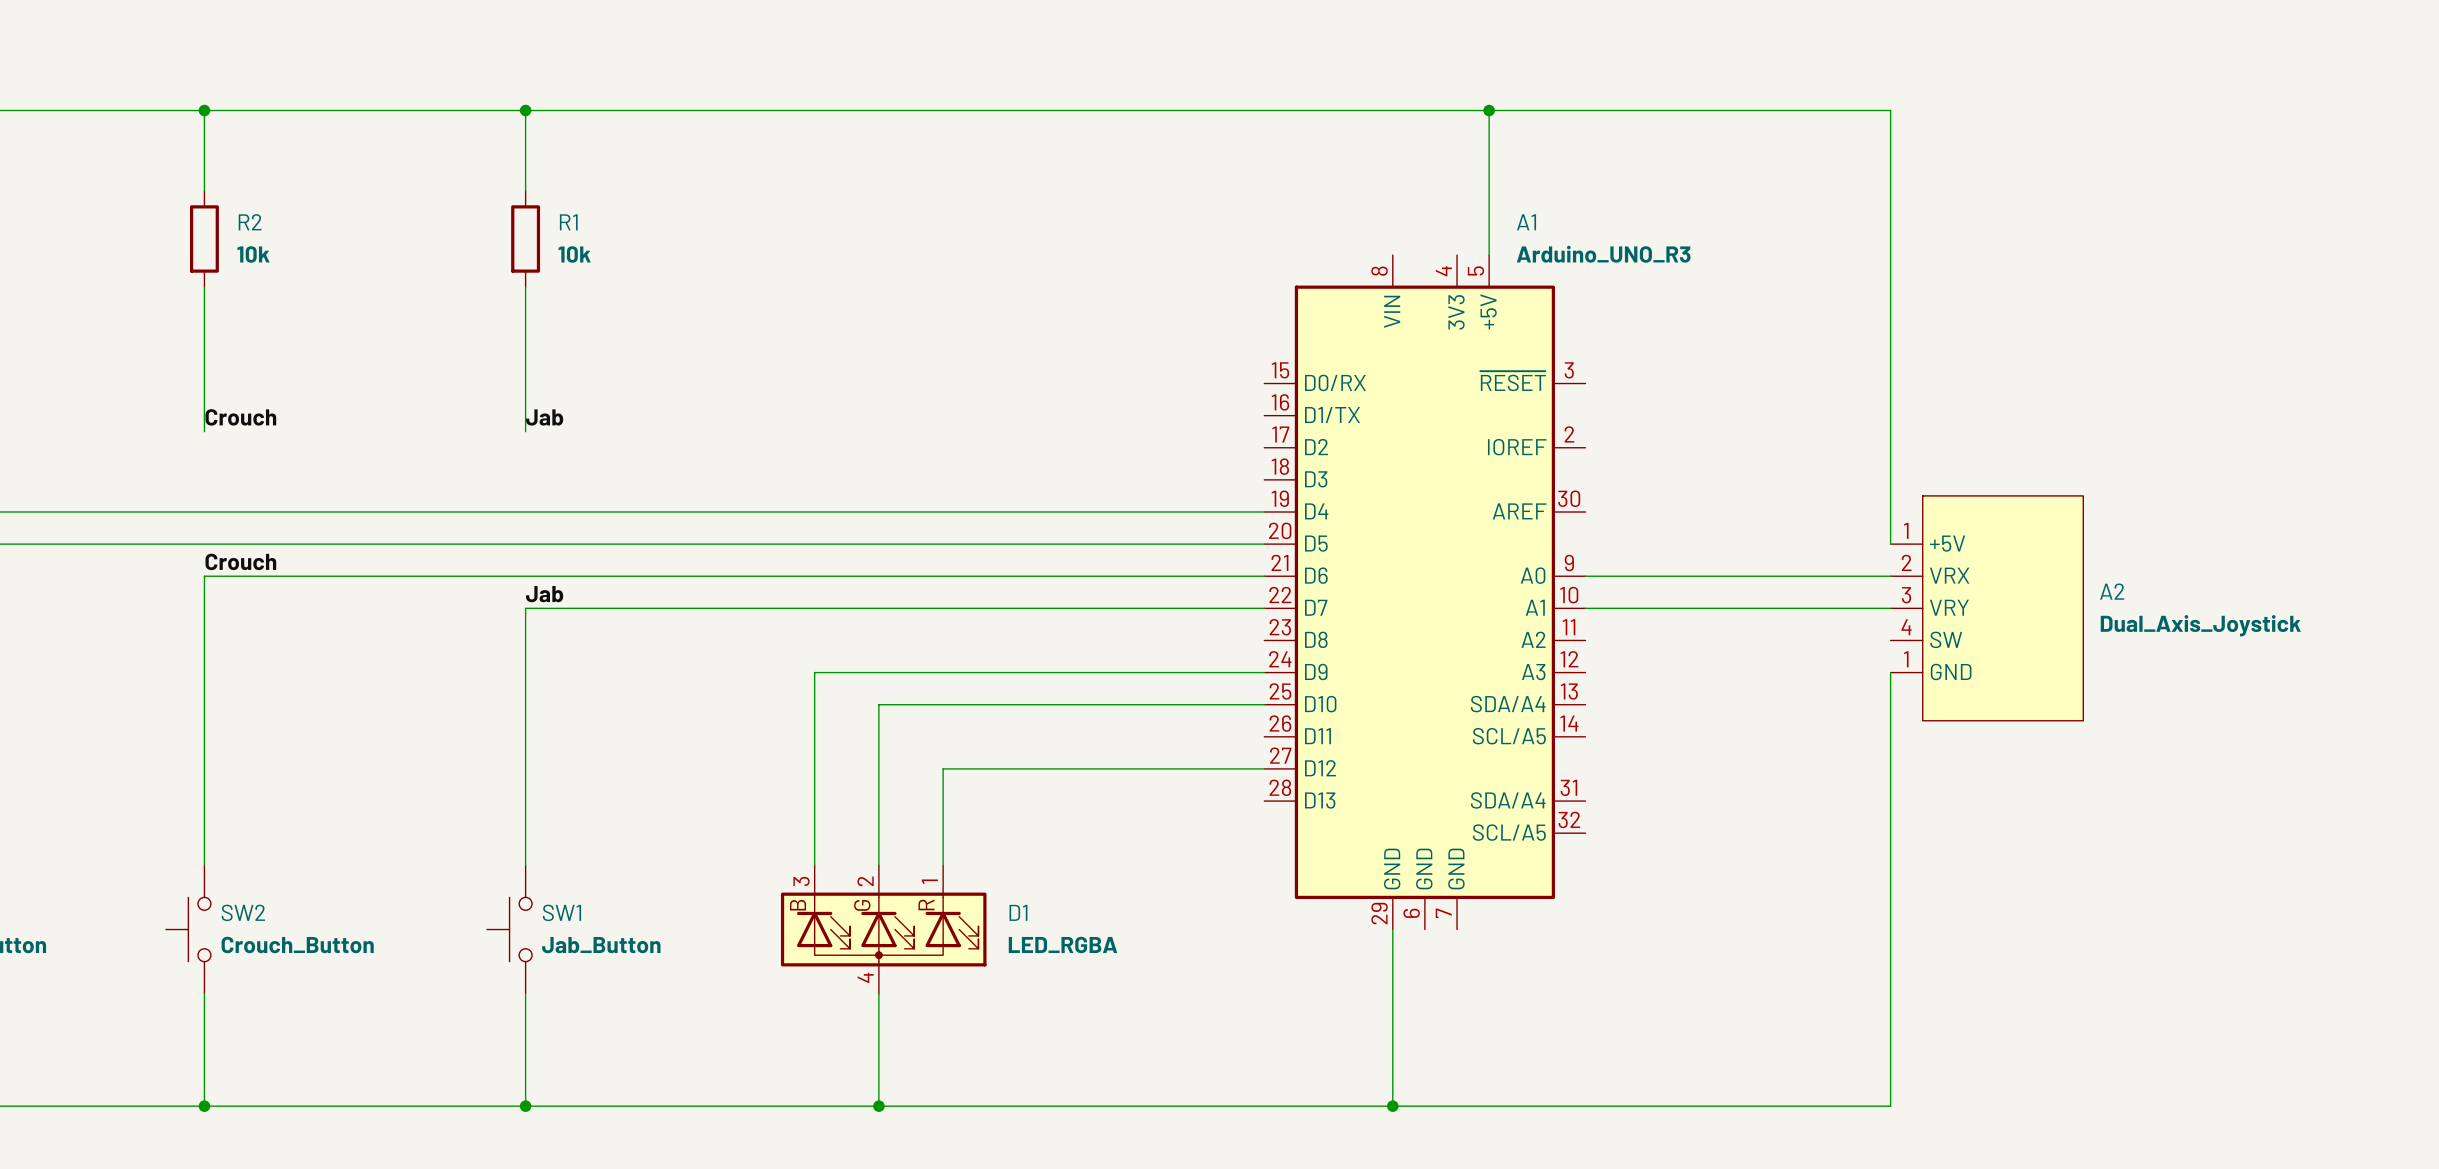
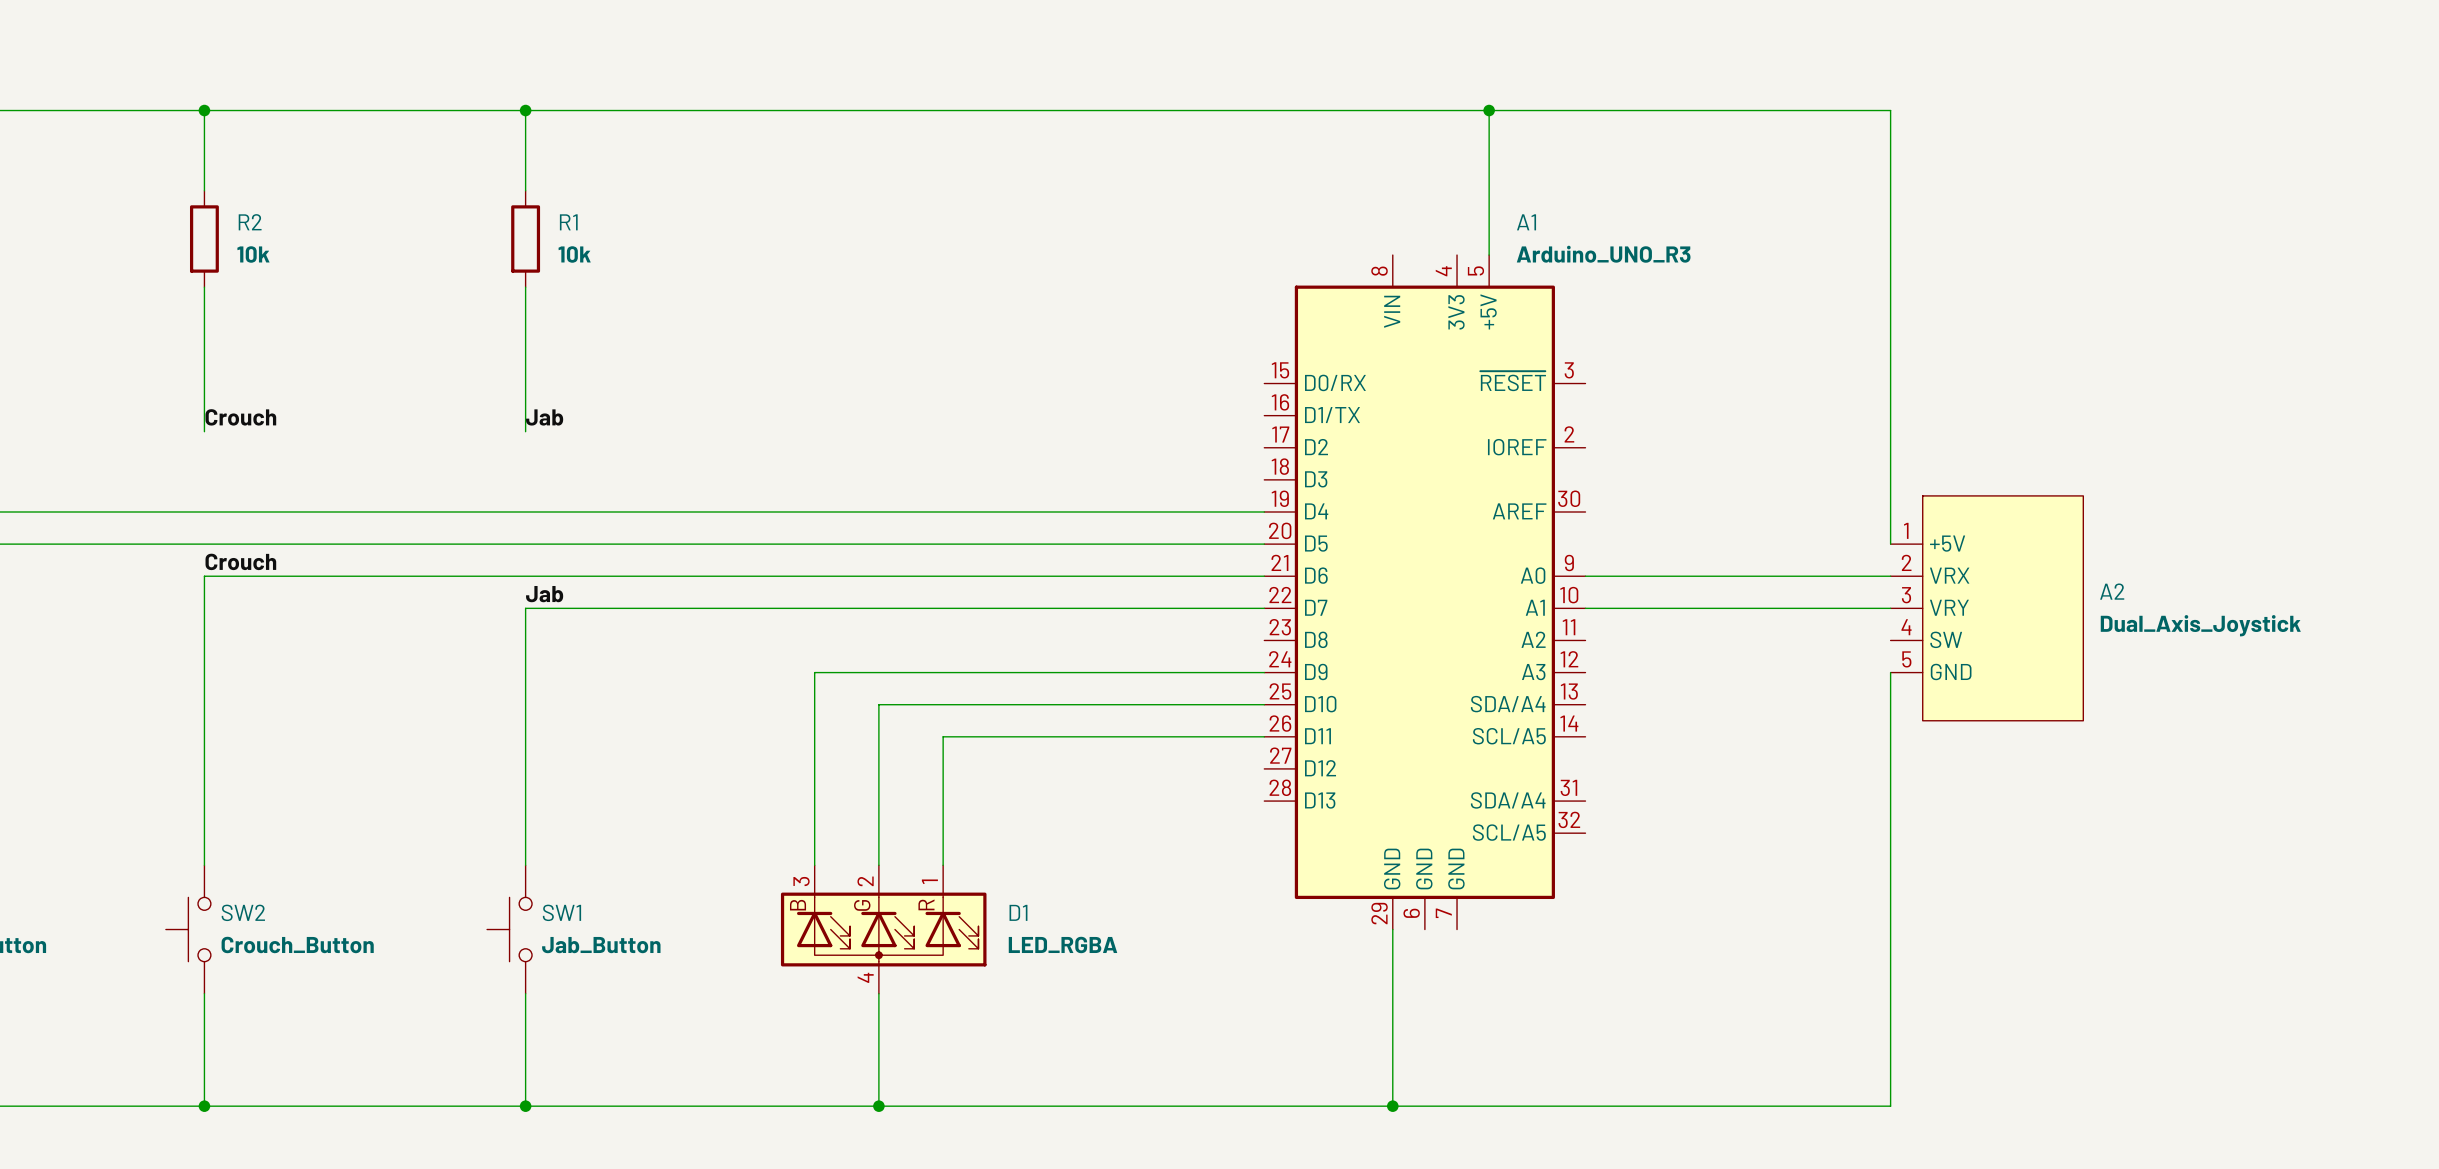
A2 pin number: 1 (1906, 659) -> 5 (1906, 659)
wire: (943, 768) (1264, 768) -> (943, 768) (943, 736) (1264, 736)

